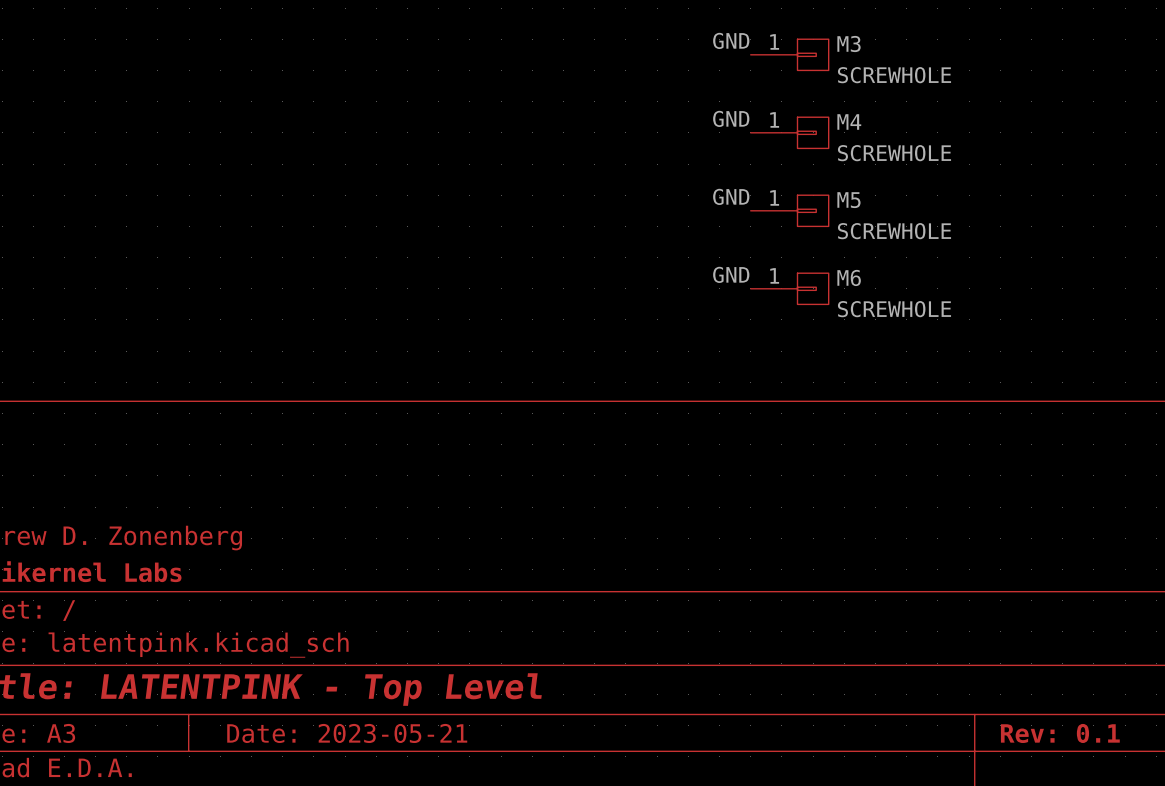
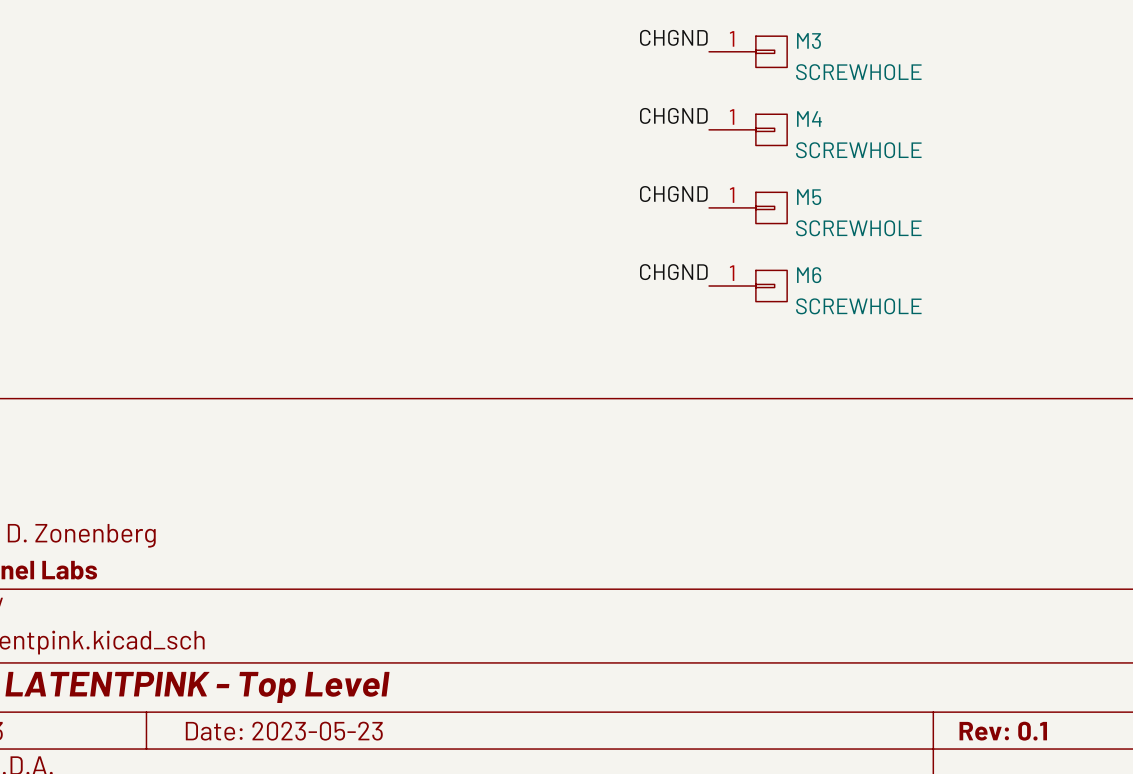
label: GND (731, 40) -> CHGND (673, 37)
label: GND (731, 118) -> CHGND (673, 115)
label: GND (731, 196) -> CHGND (673, 194)
label: GND (731, 274) -> CHGND (673, 272)
title block: Date: 2023-05-21 (347, 733) -> Date: 2023-05-23 (284, 731)

